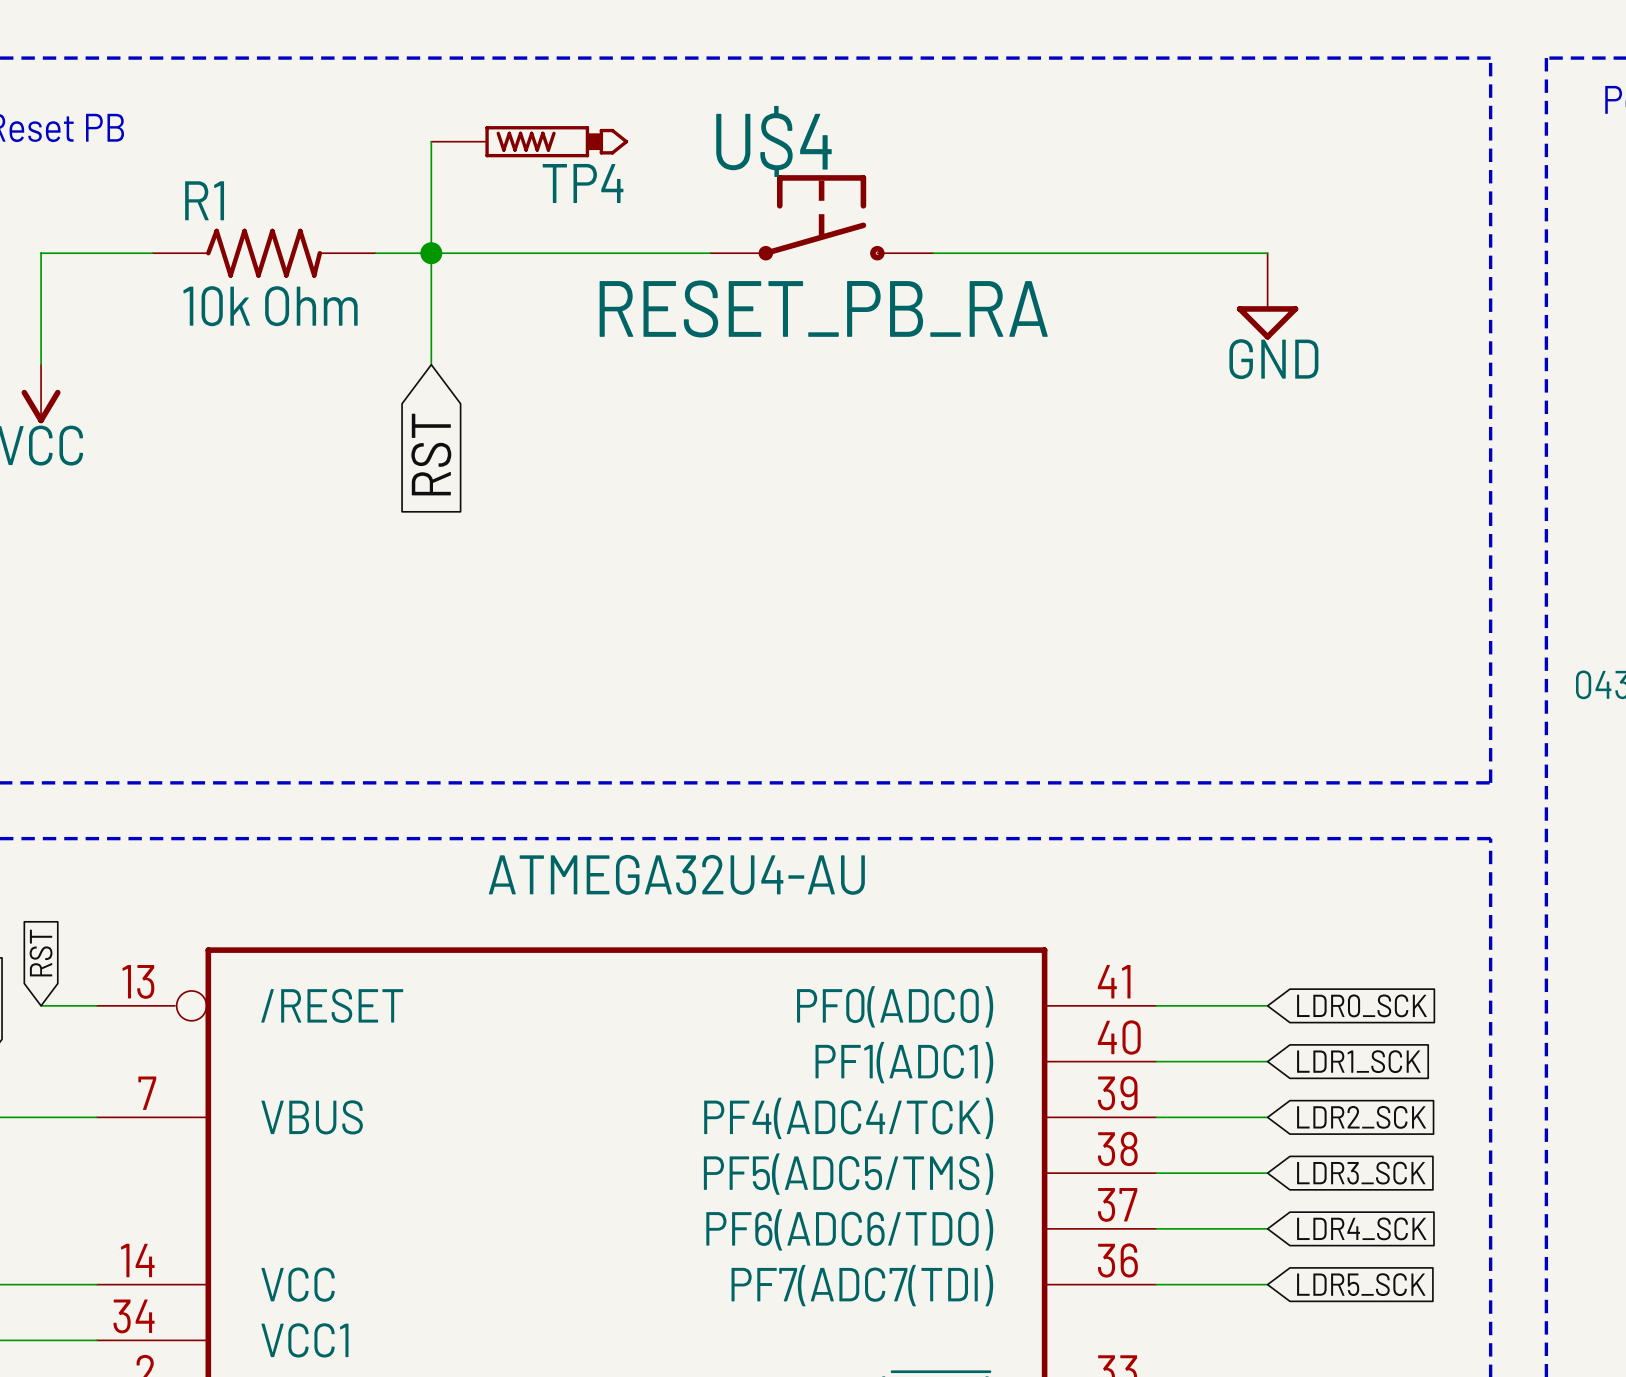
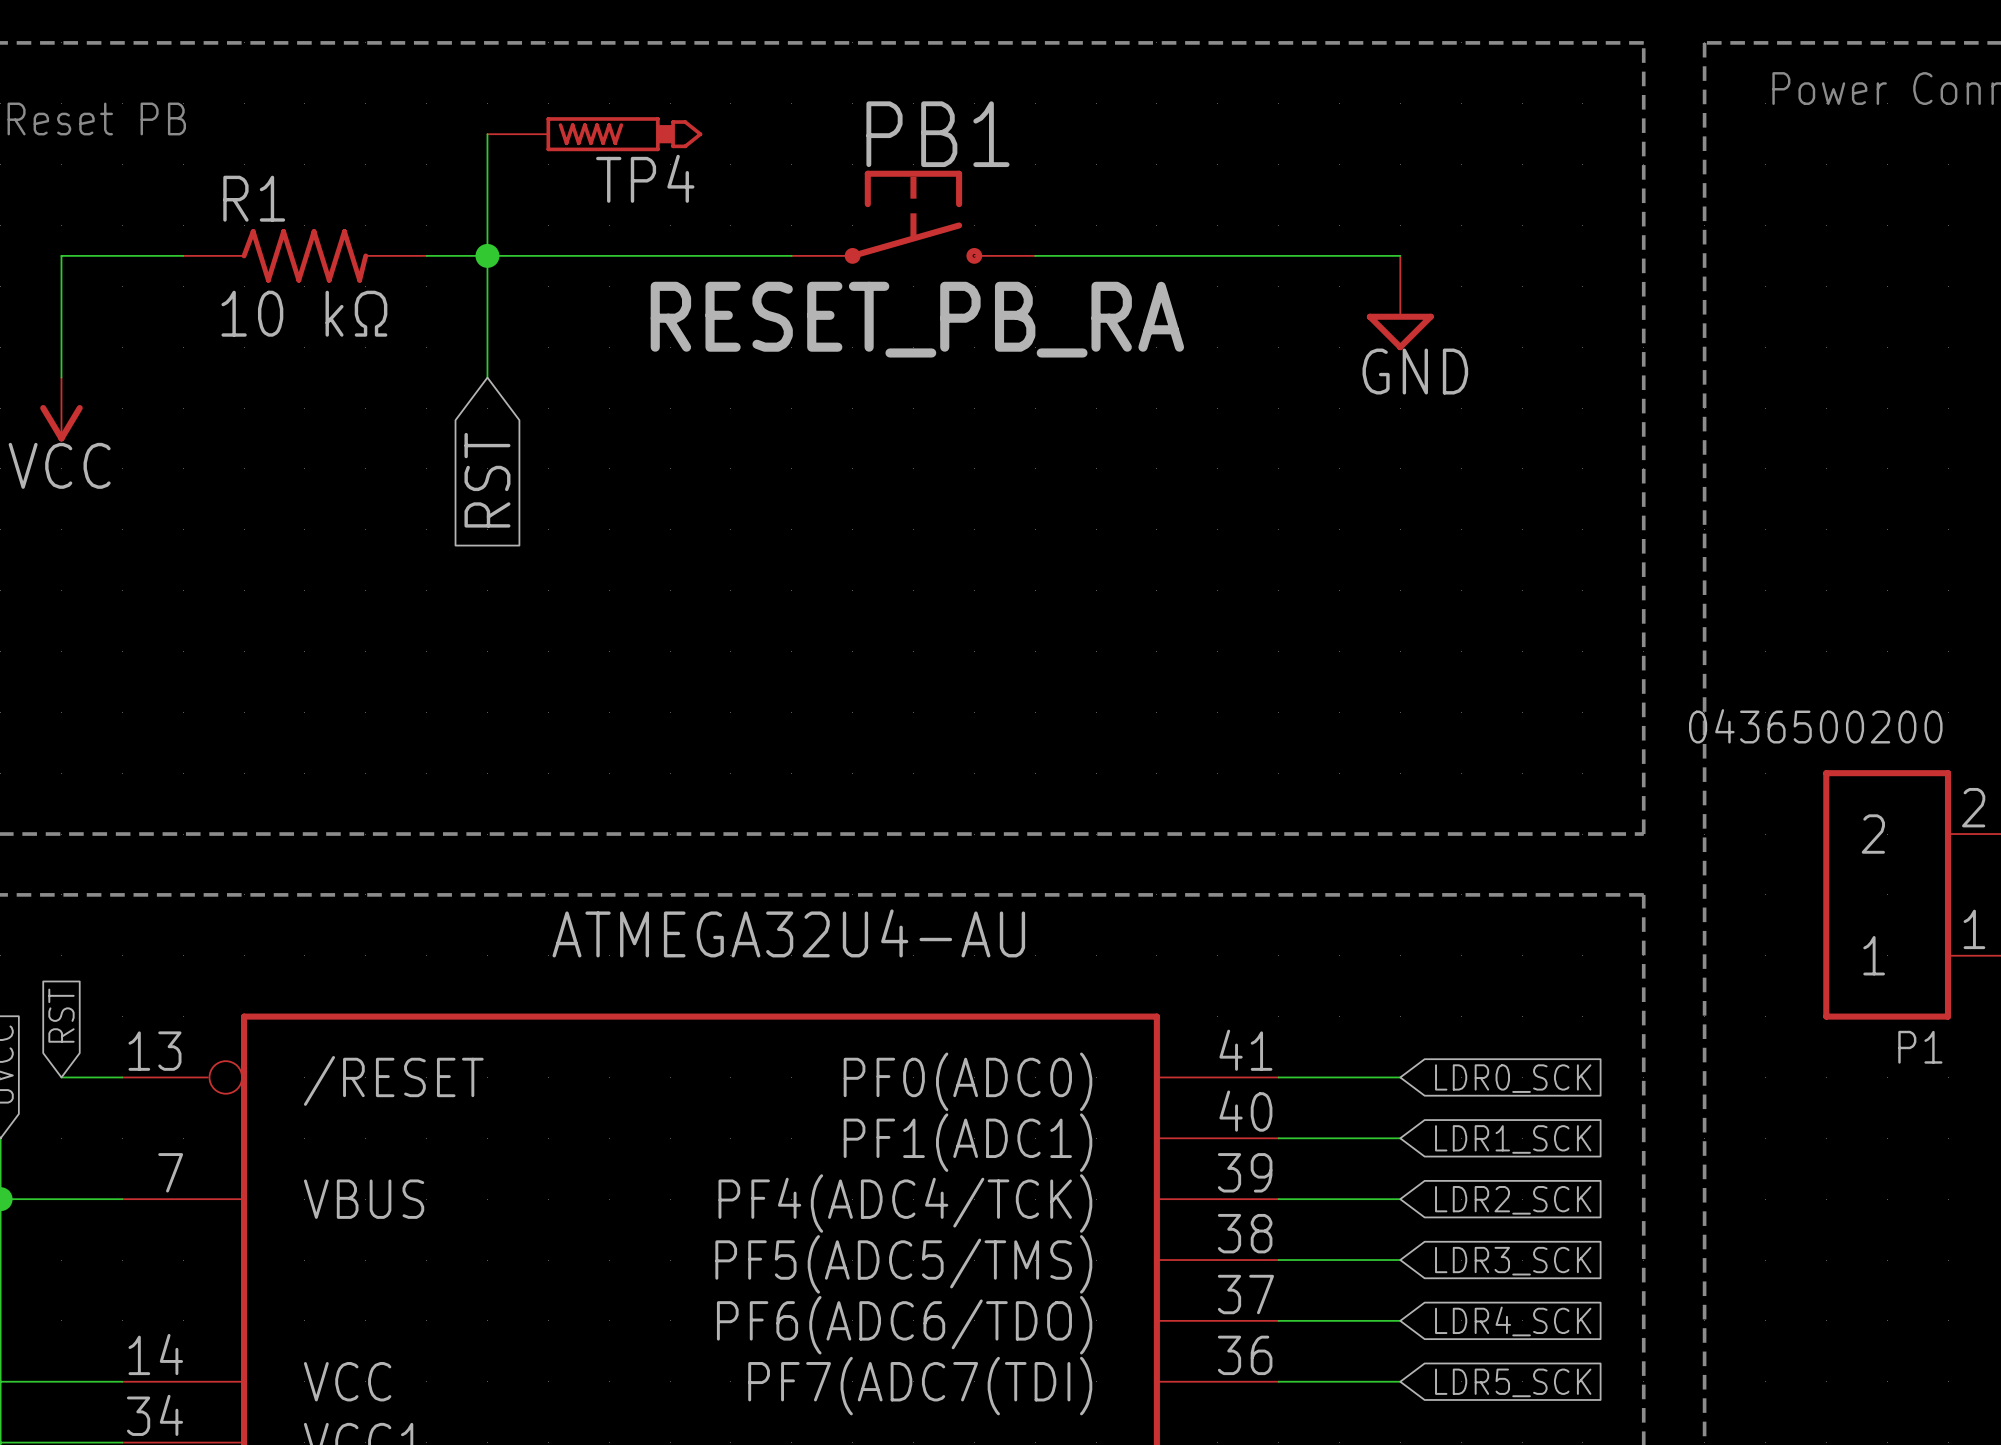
U$4 name: U$4 (773, 141) -> PB1 (937, 134)
R1 value: 10k Ohm (270, 306) -> 10 kΩ (304, 313)

